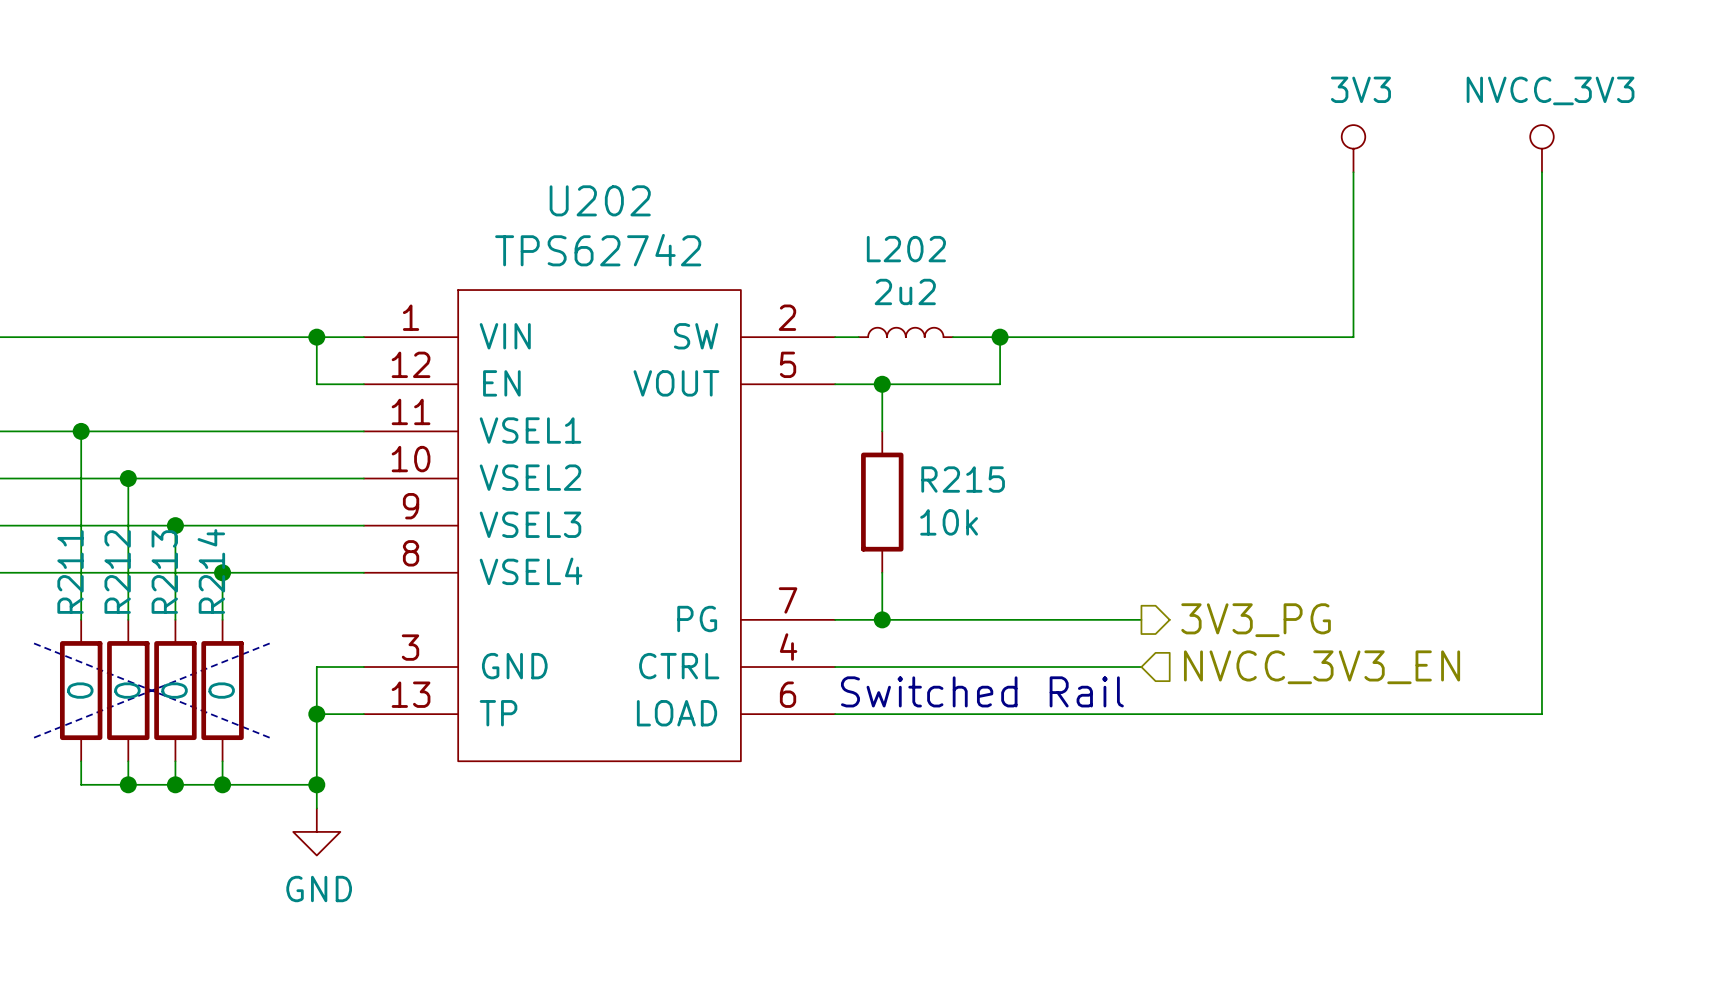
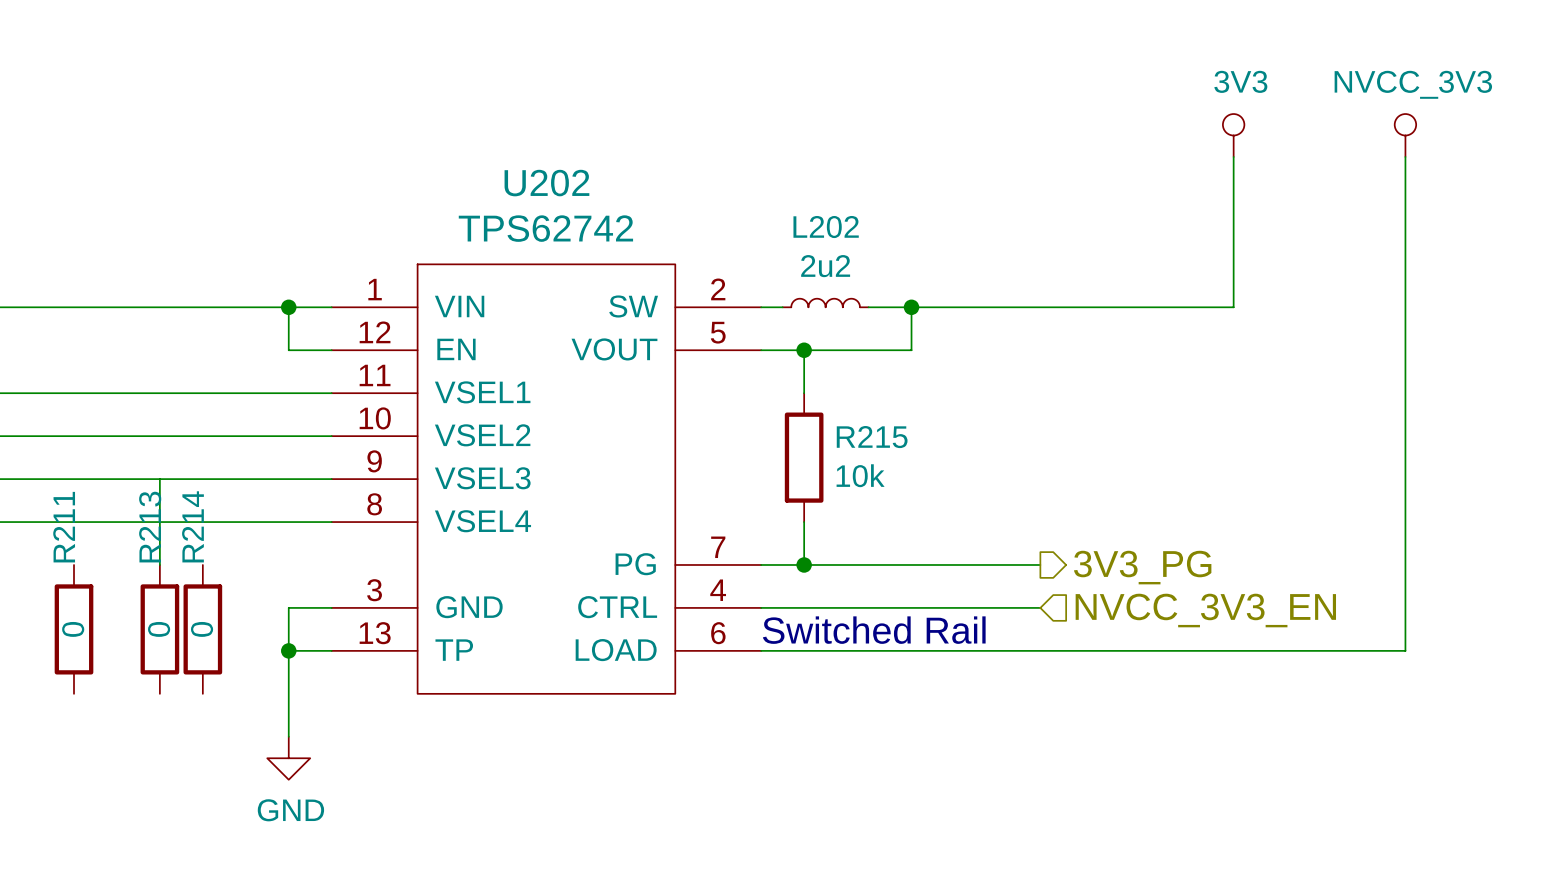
wire: (81, 431) (81, 619) -> none
junction: (81, 431) -> none
wire: (128, 478) (128, 619) -> none
junction: (128, 478) -> none
junction: (175, 525) -> none
wire: (222, 572) (222, 619) -> none
junction: (222, 572) -> none
line: (34, 643) (269, 737) -> none
line: (269, 643) (34, 737) -> none
R212: 0 (128, 690) -> none
wire: (81, 761) (81, 784) (316, 784) -> none
wire: (128, 761) (128, 784) -> none
wire: (175, 761) (175, 784) -> none
wire: (222, 761) (222, 784) -> none
junction: (128, 784) -> none
junction: (175, 784) -> none
junction: (222, 784) -> none
junction: (316, 784) -> none

